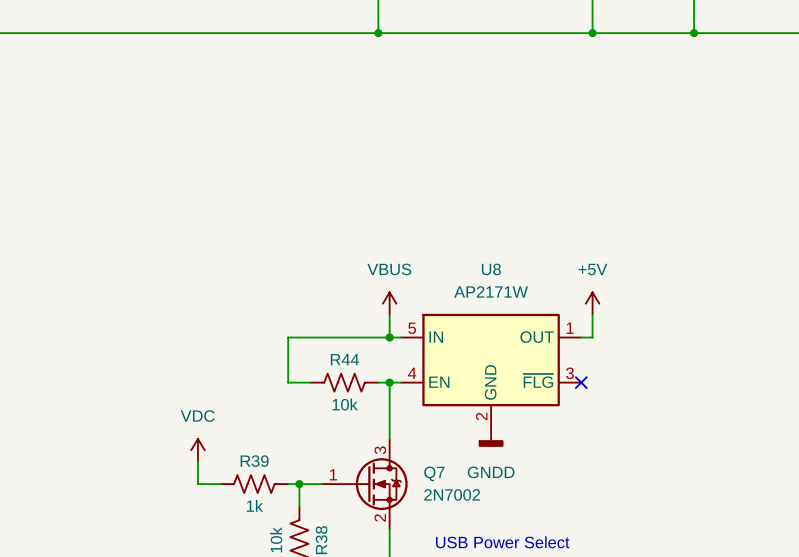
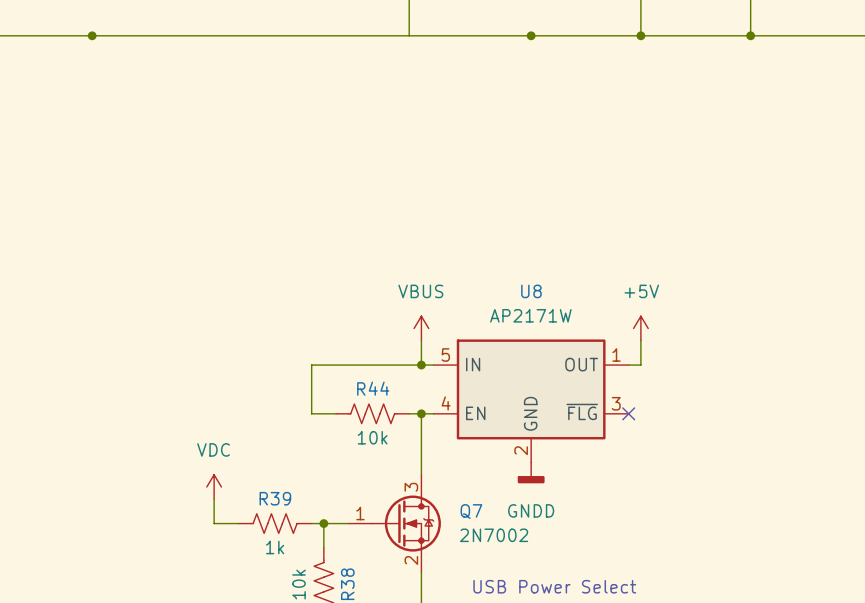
junction: none -> (92, 35)
junction: (378, 33) -> none
junction: none -> (531, 35)

